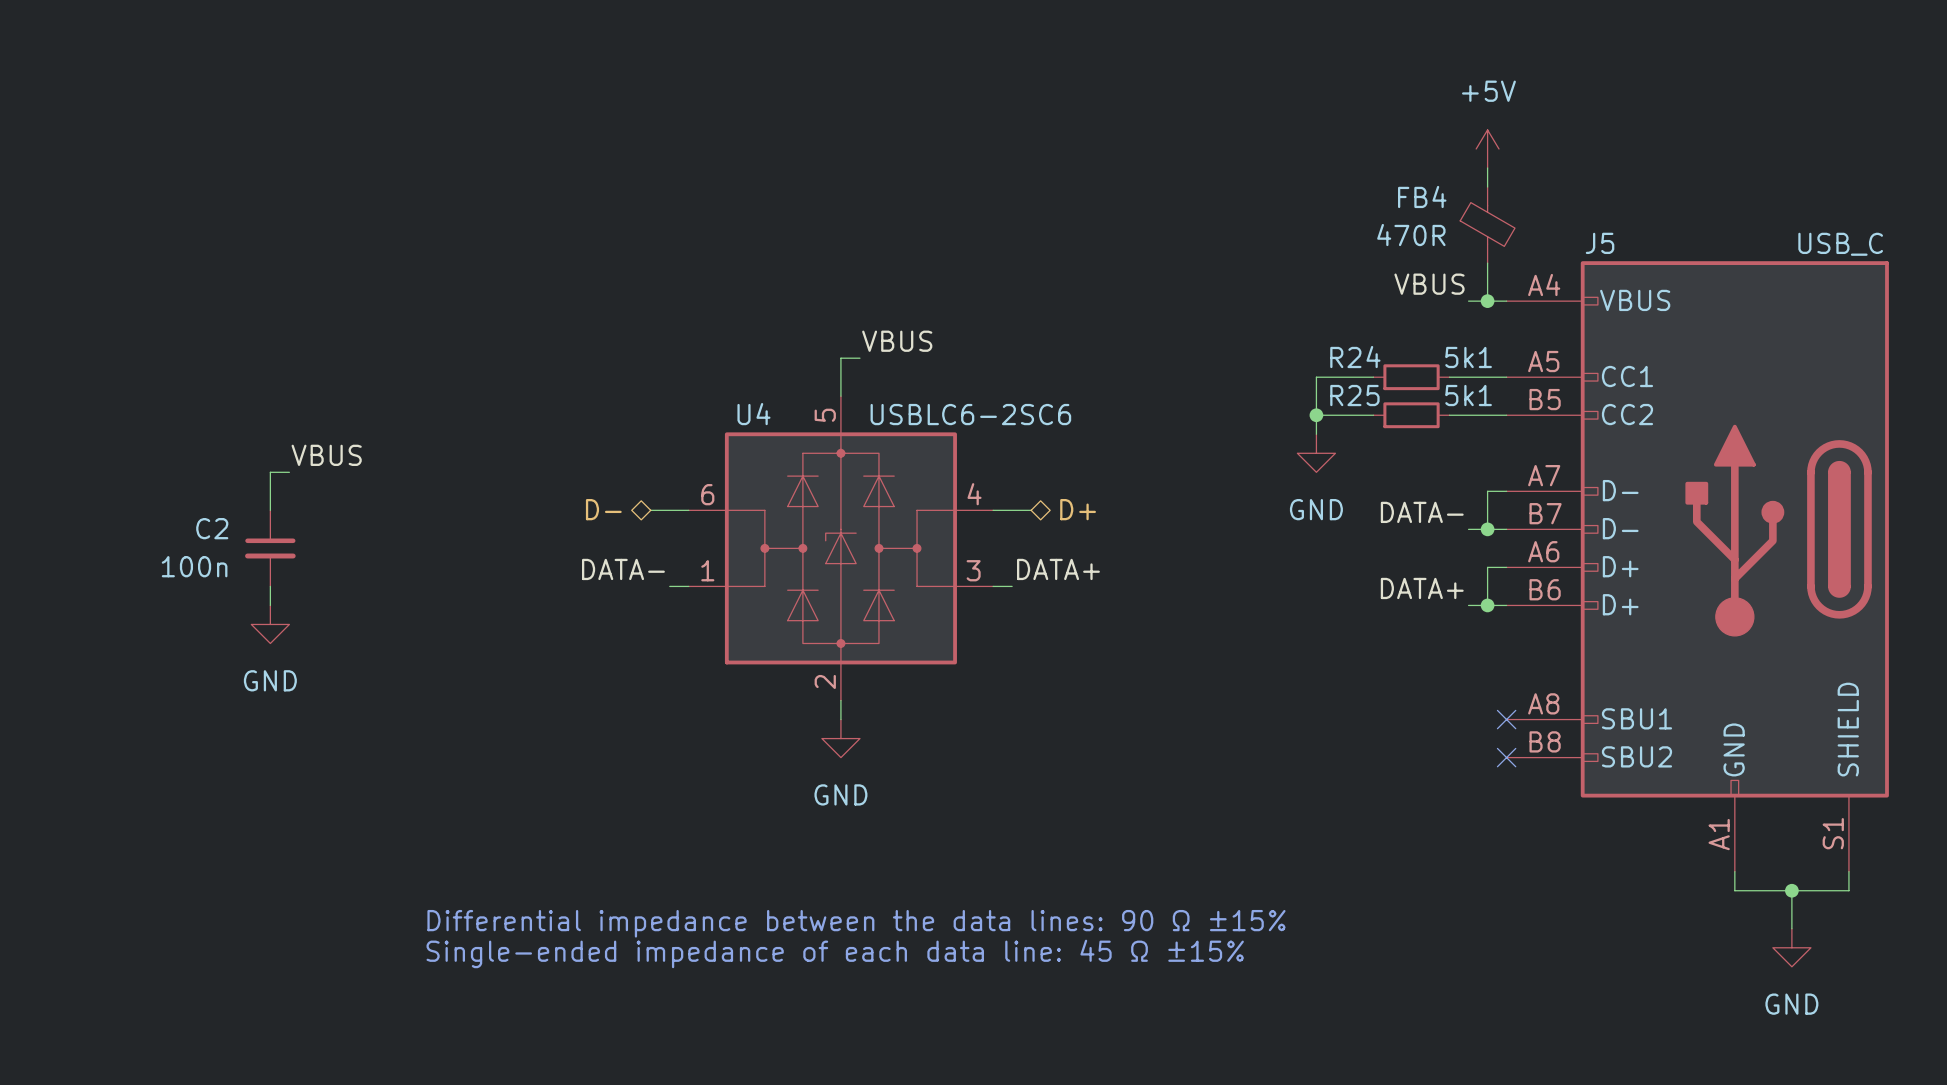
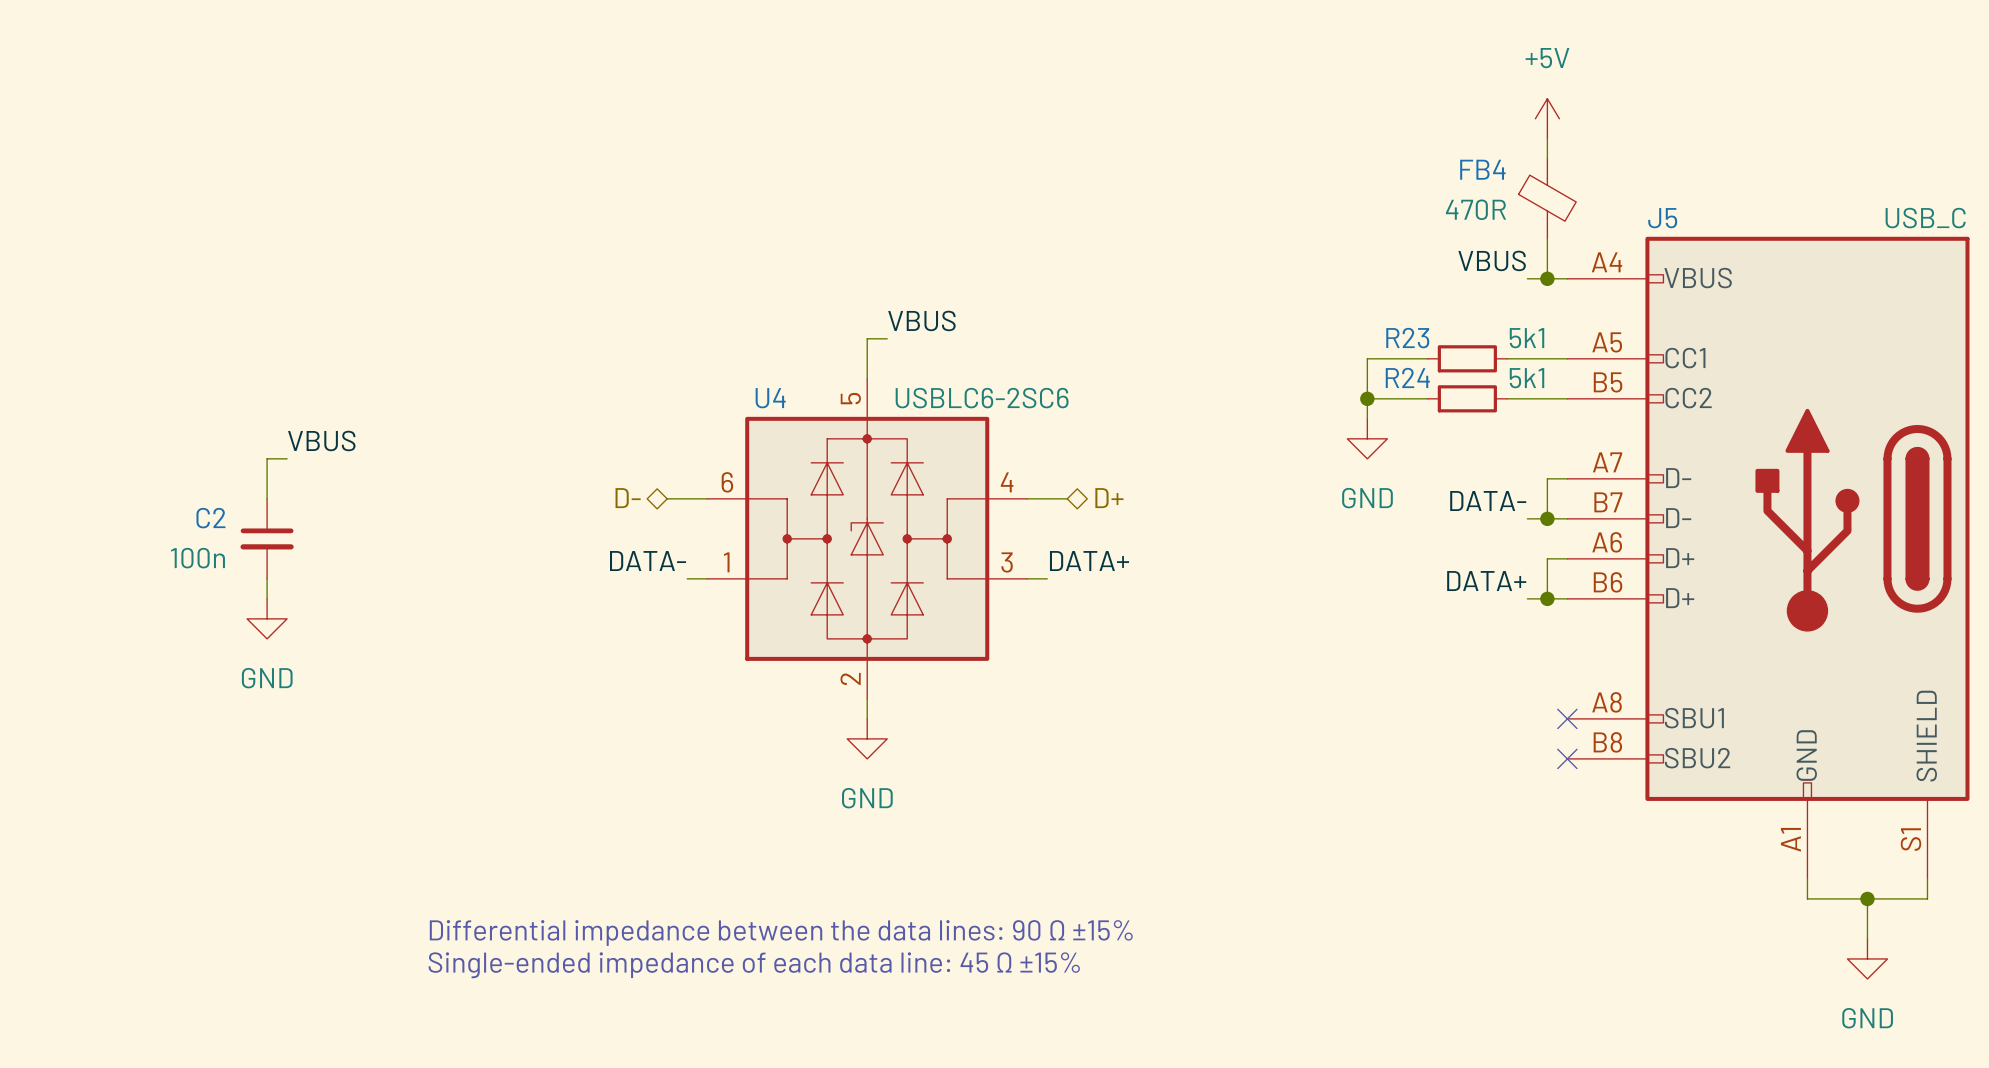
R24 name: R24 (1355, 357) -> R23 (1407, 338)
R25 name: R25 (1354, 395) -> R24 (1407, 377)

